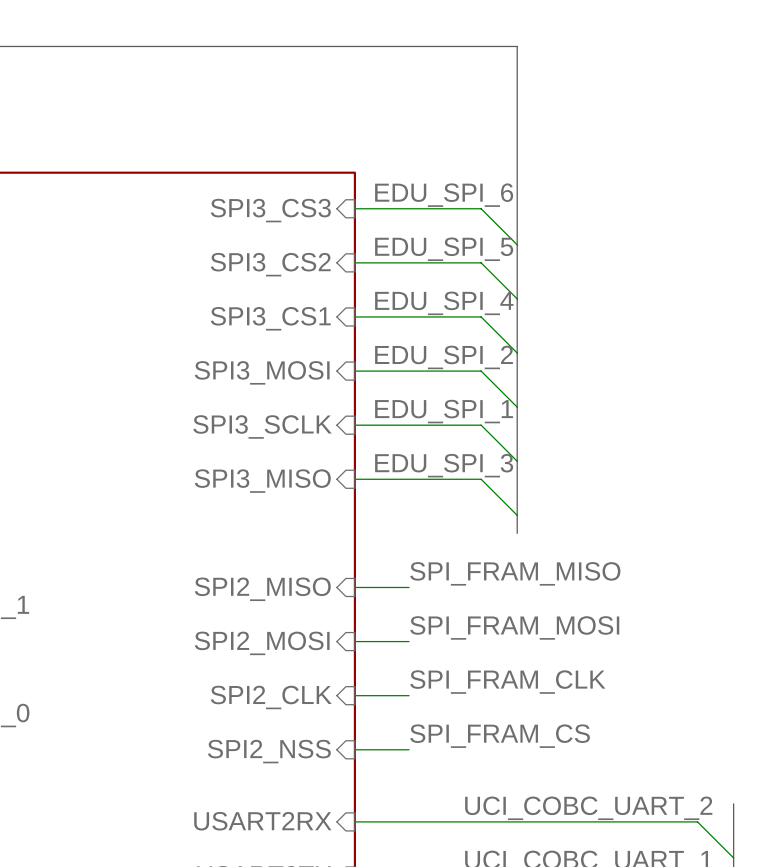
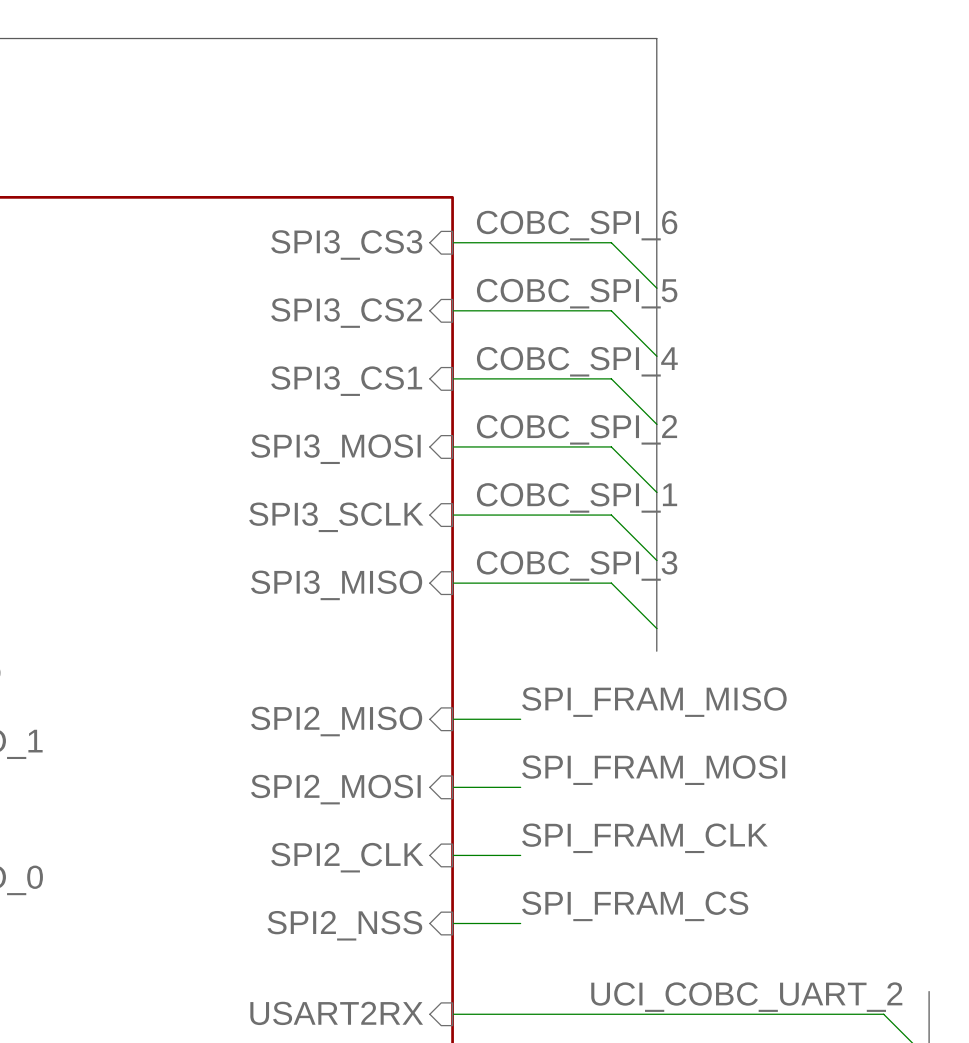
label: EDU_SPI_6 (444, 195) -> COBC_SPI_6 (577, 225)
label: EDU_SPI_5 (444, 249) -> COBC_SPI_5 (577, 293)
label: EDU_SPI_4 (444, 303) -> COBC_SPI_4 (577, 361)
label: EDU_SPI_2 (444, 357) -> COBC_SPI_2 (577, 429)
label: EDU_SPI_1 (444, 411) -> COBC_SPI_1 (577, 497)
label: EDU_SPI_3 (444, 465) -> COBC_SPI_3 (577, 565)

